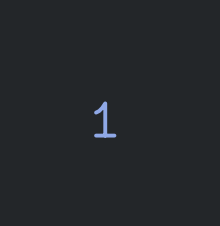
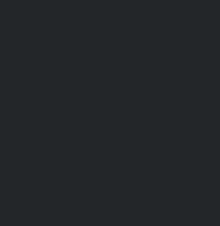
text: 1 (105, 119) -> none

